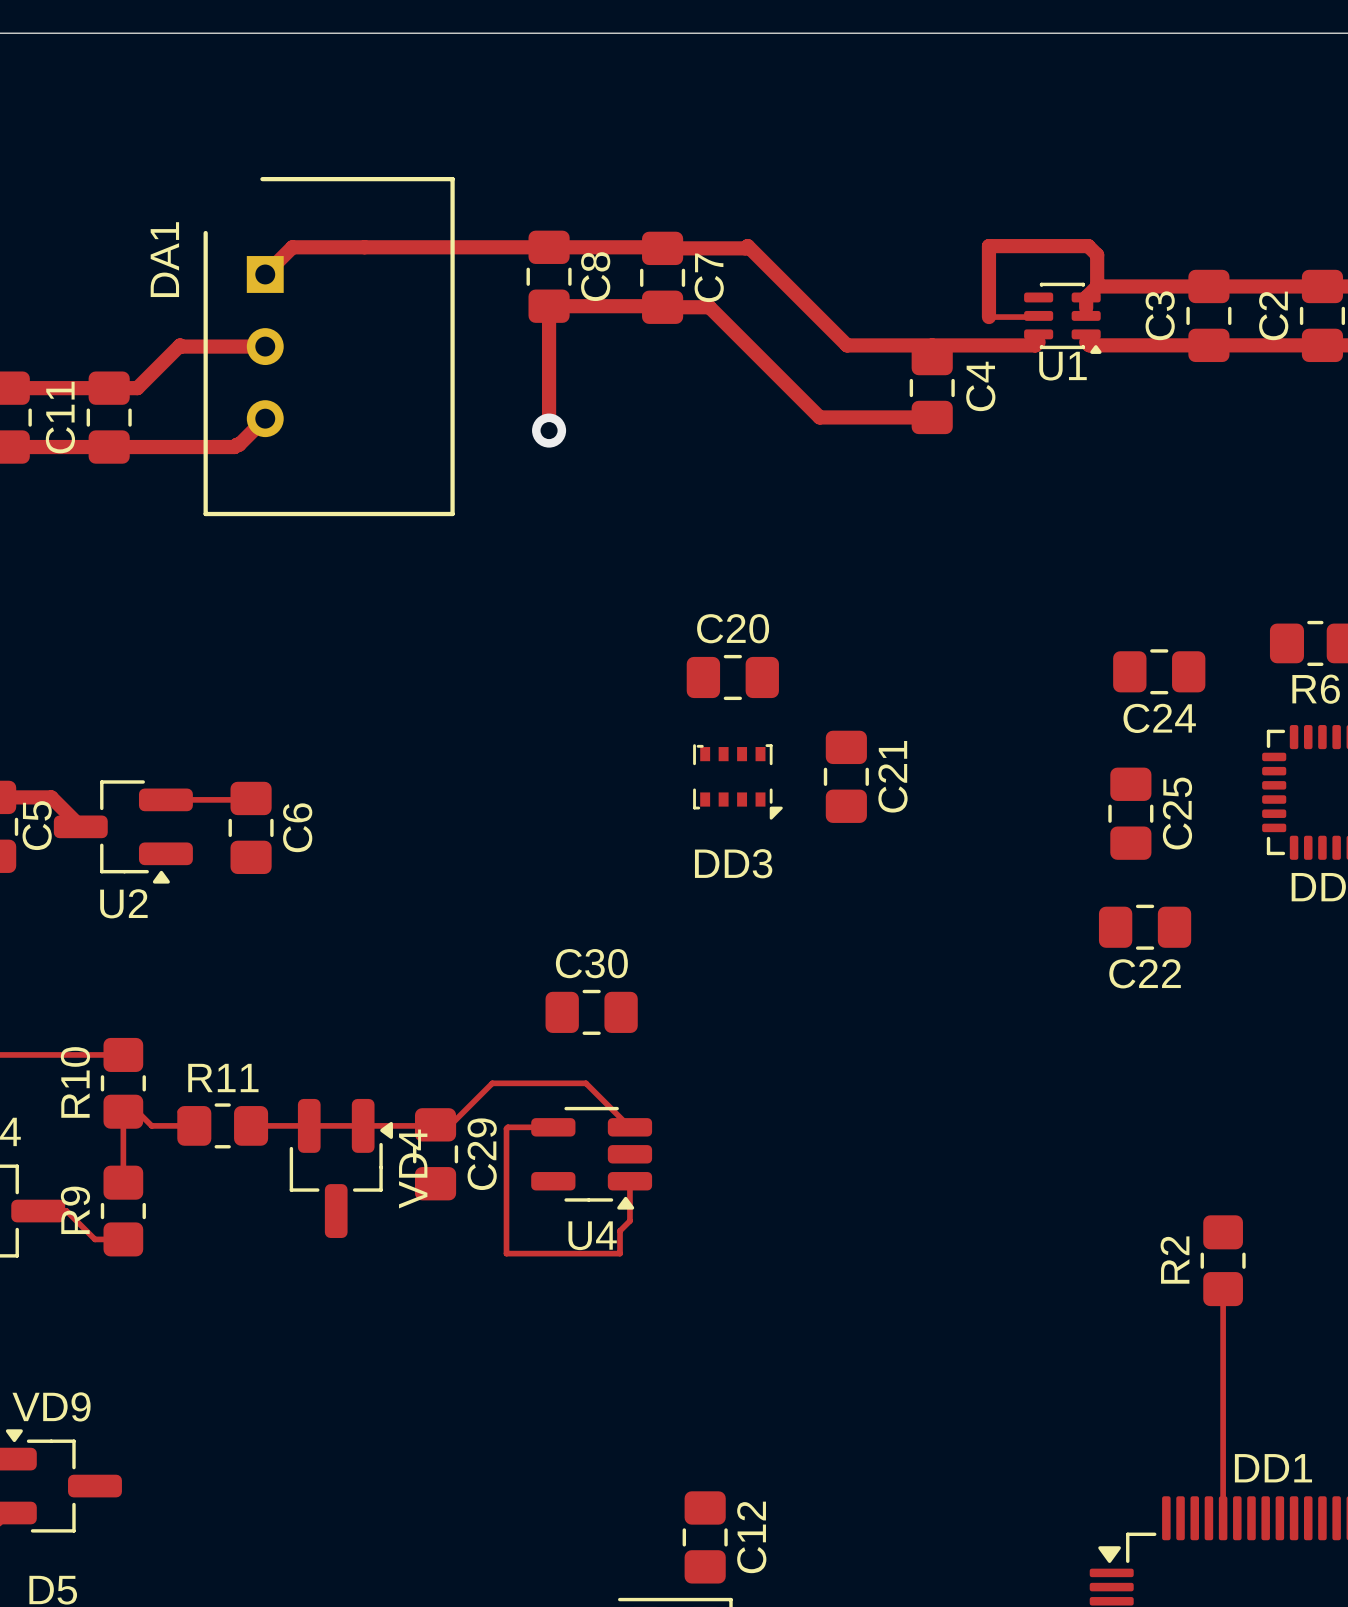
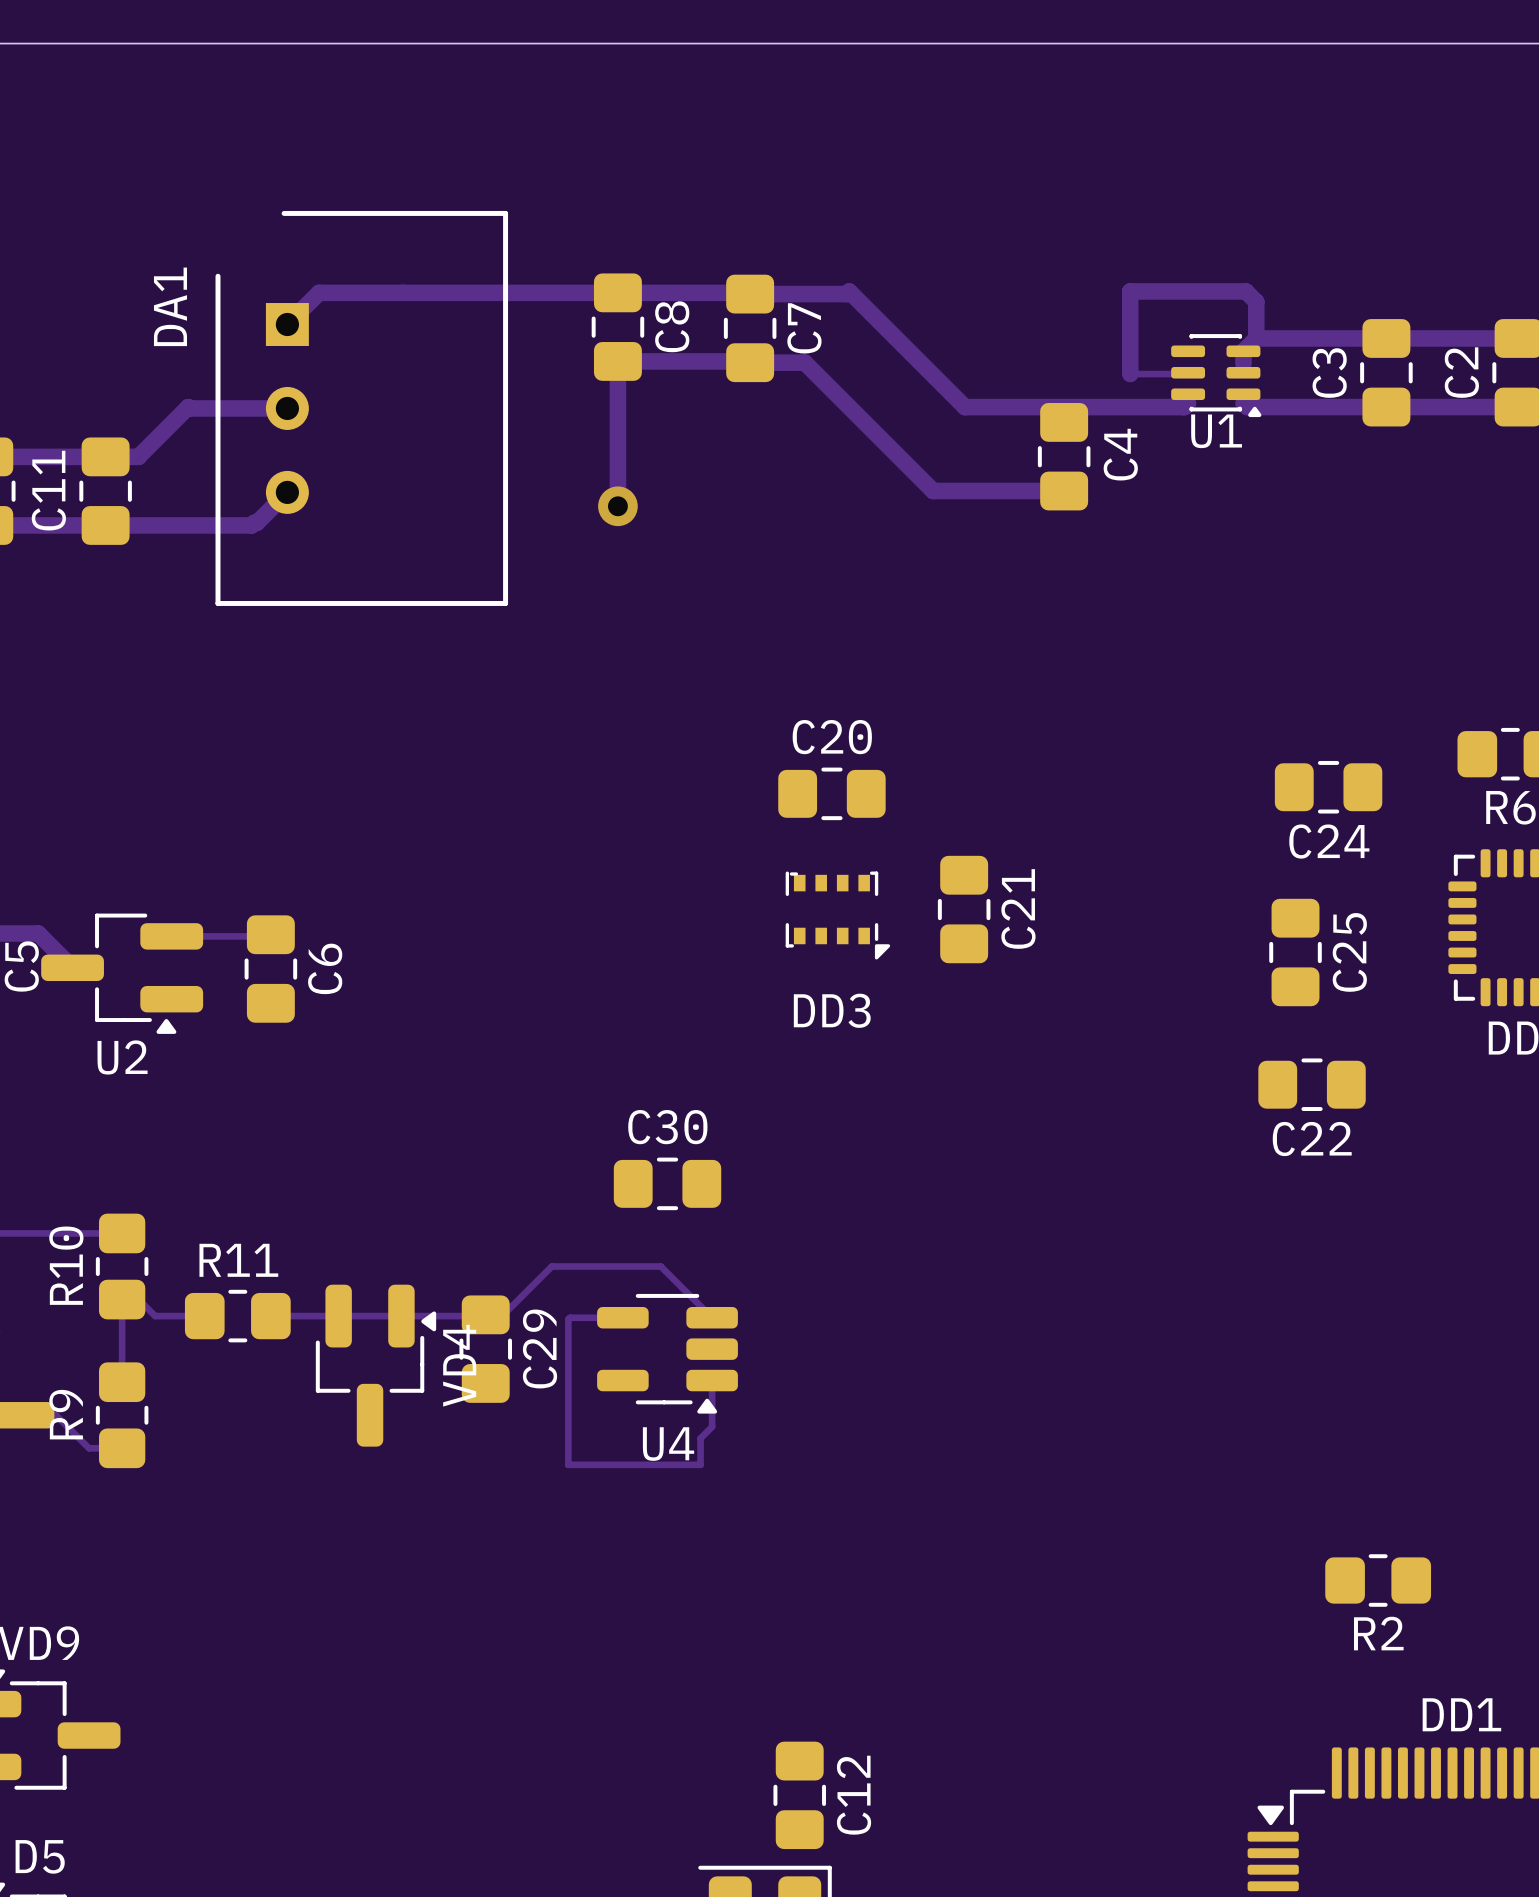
R2 name position: R2 (1175, 1260) -> R2 (1378, 1633)
R2 rotation: 0° (1223, 1260) -> 90° clockwise (1378, 1580)
R2 position: (1223, 1260) -> (1378, 1580)
track: (1223, 1289) (1223, 1518) -> none

